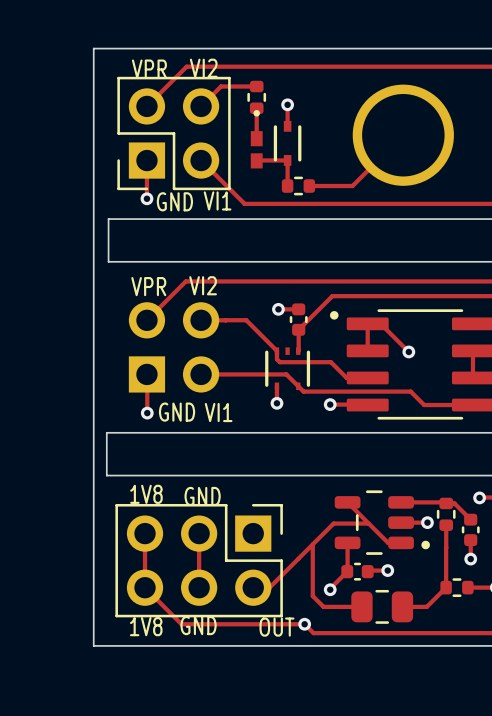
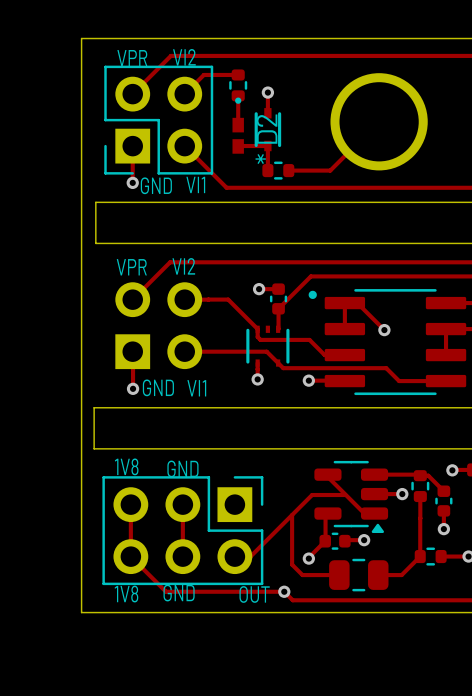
D2 name: none -> D2 (267, 129)
D2 text: none -> * (260, 159)
part footprint: [334, 490, 430, 555] -> [314, 460, 389, 533]

